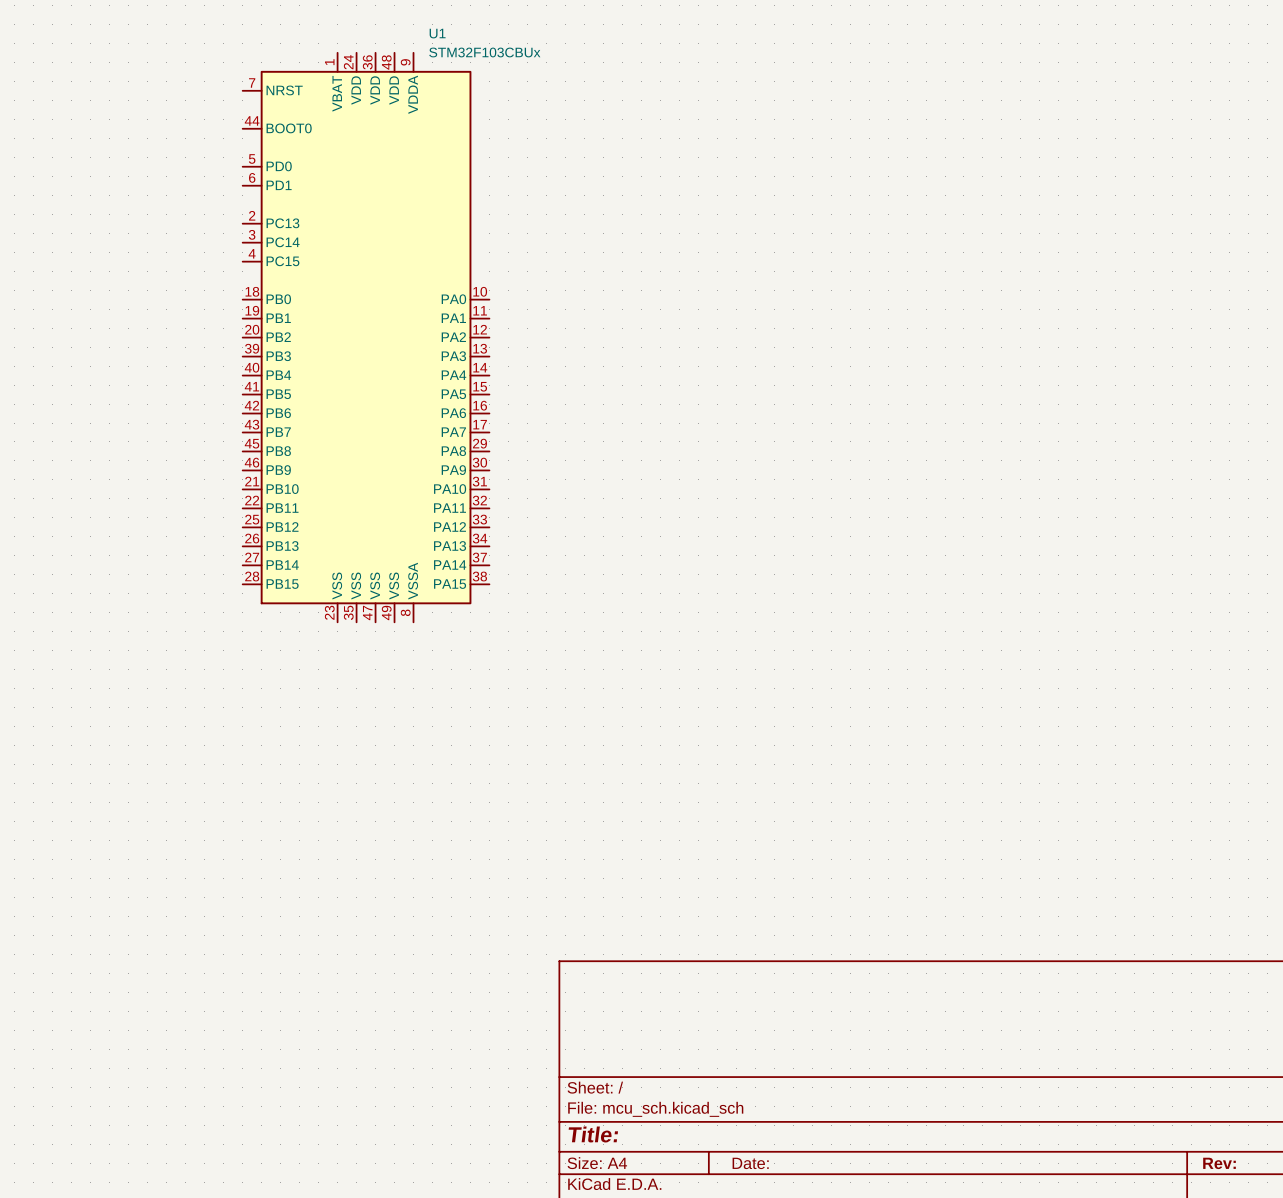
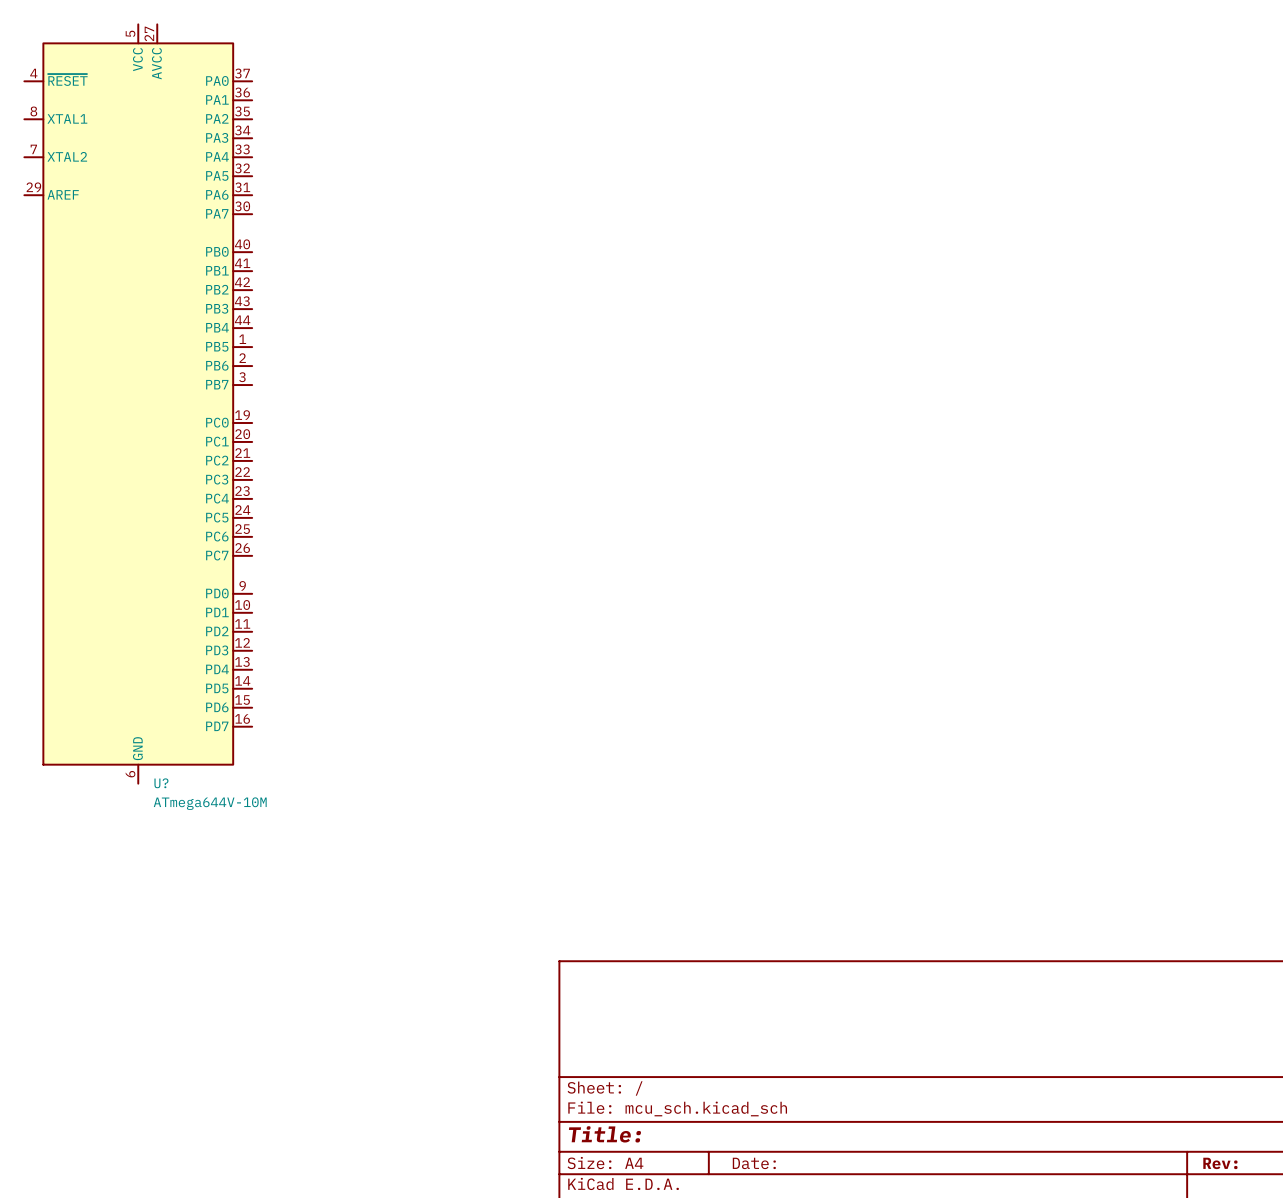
U1: STM32F103CBUx (366, 337) -> none
U?: none -> ATmega644V-10M (138, 404)

